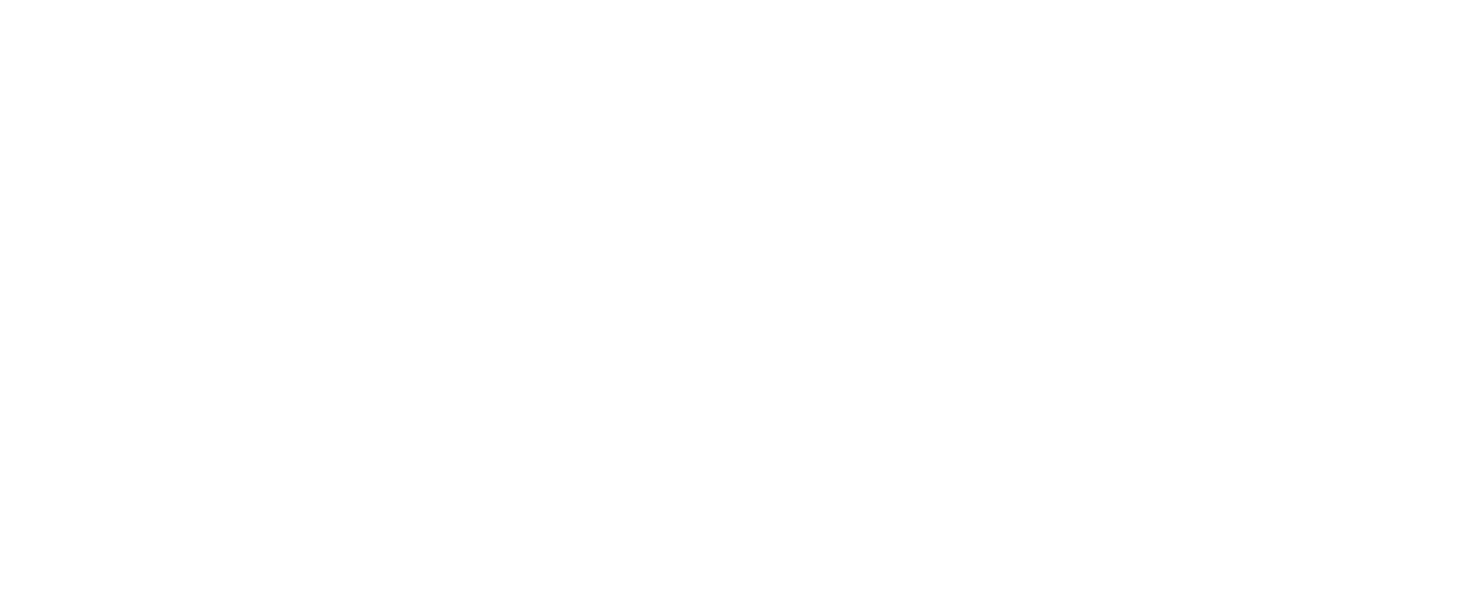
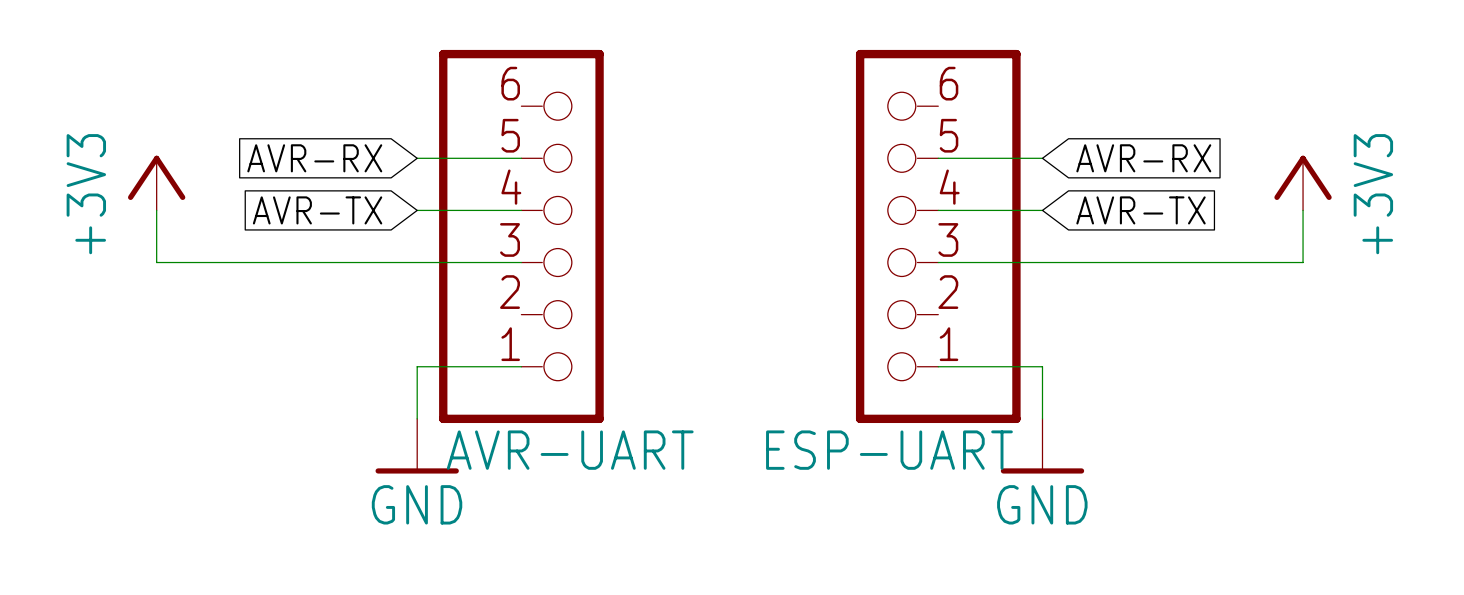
global label: none -> AVR-RX (314, 158)
wire: none -> (417, 158) (521, 158)
wire: none -> (938, 158) (1042, 158)
global label: none -> AVR-RX (1143, 158)
power symbol: none -> +3V3 (156, 183)
power symbol: none -> +3V3 (1303, 183)
wire: none -> (156, 210) (156, 262) (521, 262)
global label: none -> AVR-TX (317, 210)
wire: none -> (417, 210) (521, 210)
wire: none -> (938, 210) (1042, 210)
global label: none -> AVR-TX (1141, 210)
wire: none -> (1303, 210) (1303, 262) (938, 262)
AVR-UART: none -> (521, 236)
ESP-UART: none -> (938, 236)
wire: none -> (521, 366) (417, 366) (417, 418)
wire: none -> (938, 366) (1042, 366) (1042, 418)
power symbol: none -> GND (417, 446)
power symbol: none -> GND (1042, 446)

